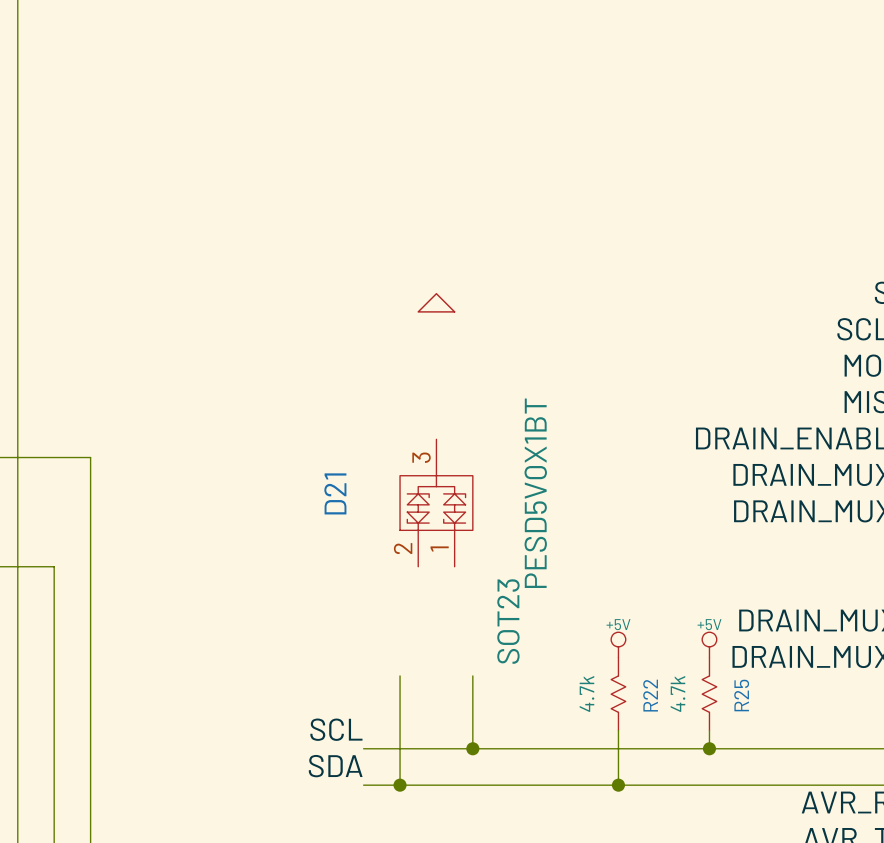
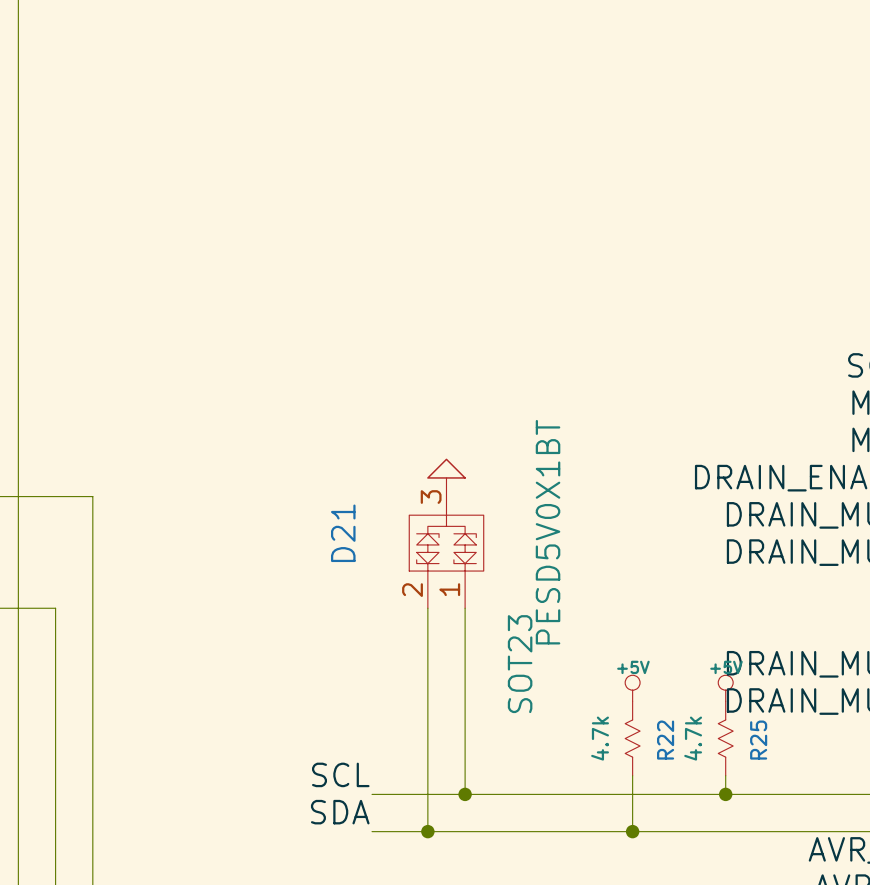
power symbol position: (436, 302) -> (446, 468)
wire: none -> (427, 608) (427, 831)
wire: none -> (465, 608) (465, 794)
wire: (400, 675) (400, 785) -> none
wire: (472, 675) (472, 748) -> none
junction position: (472, 748) -> (465, 794)
junction position: (400, 785) -> (427, 831)

